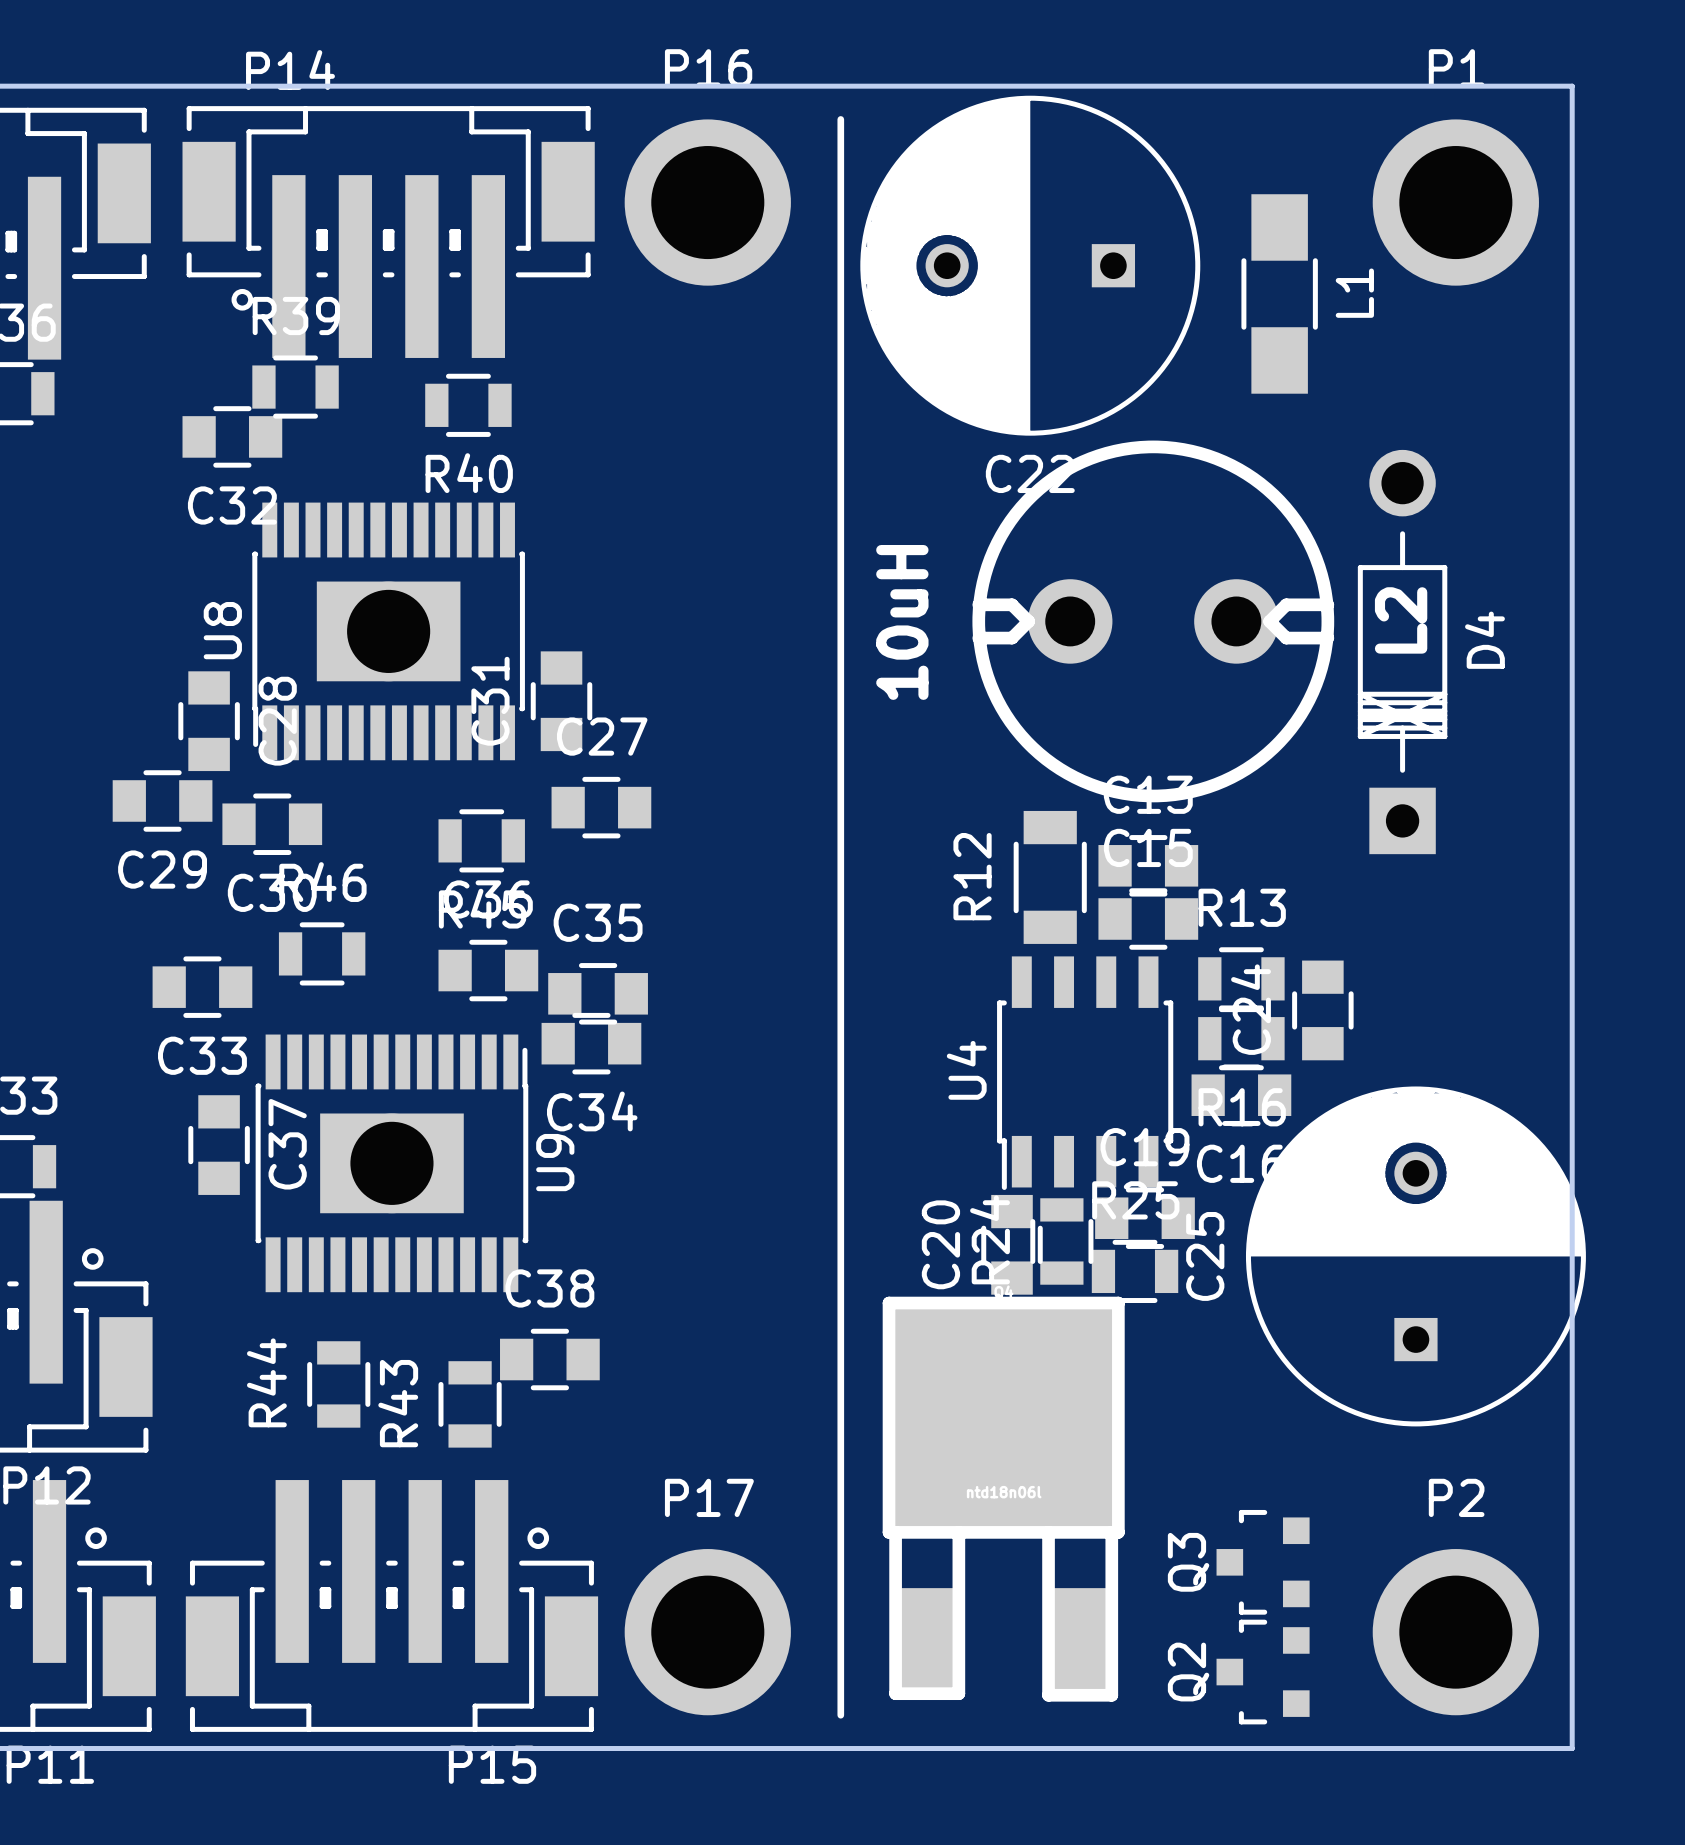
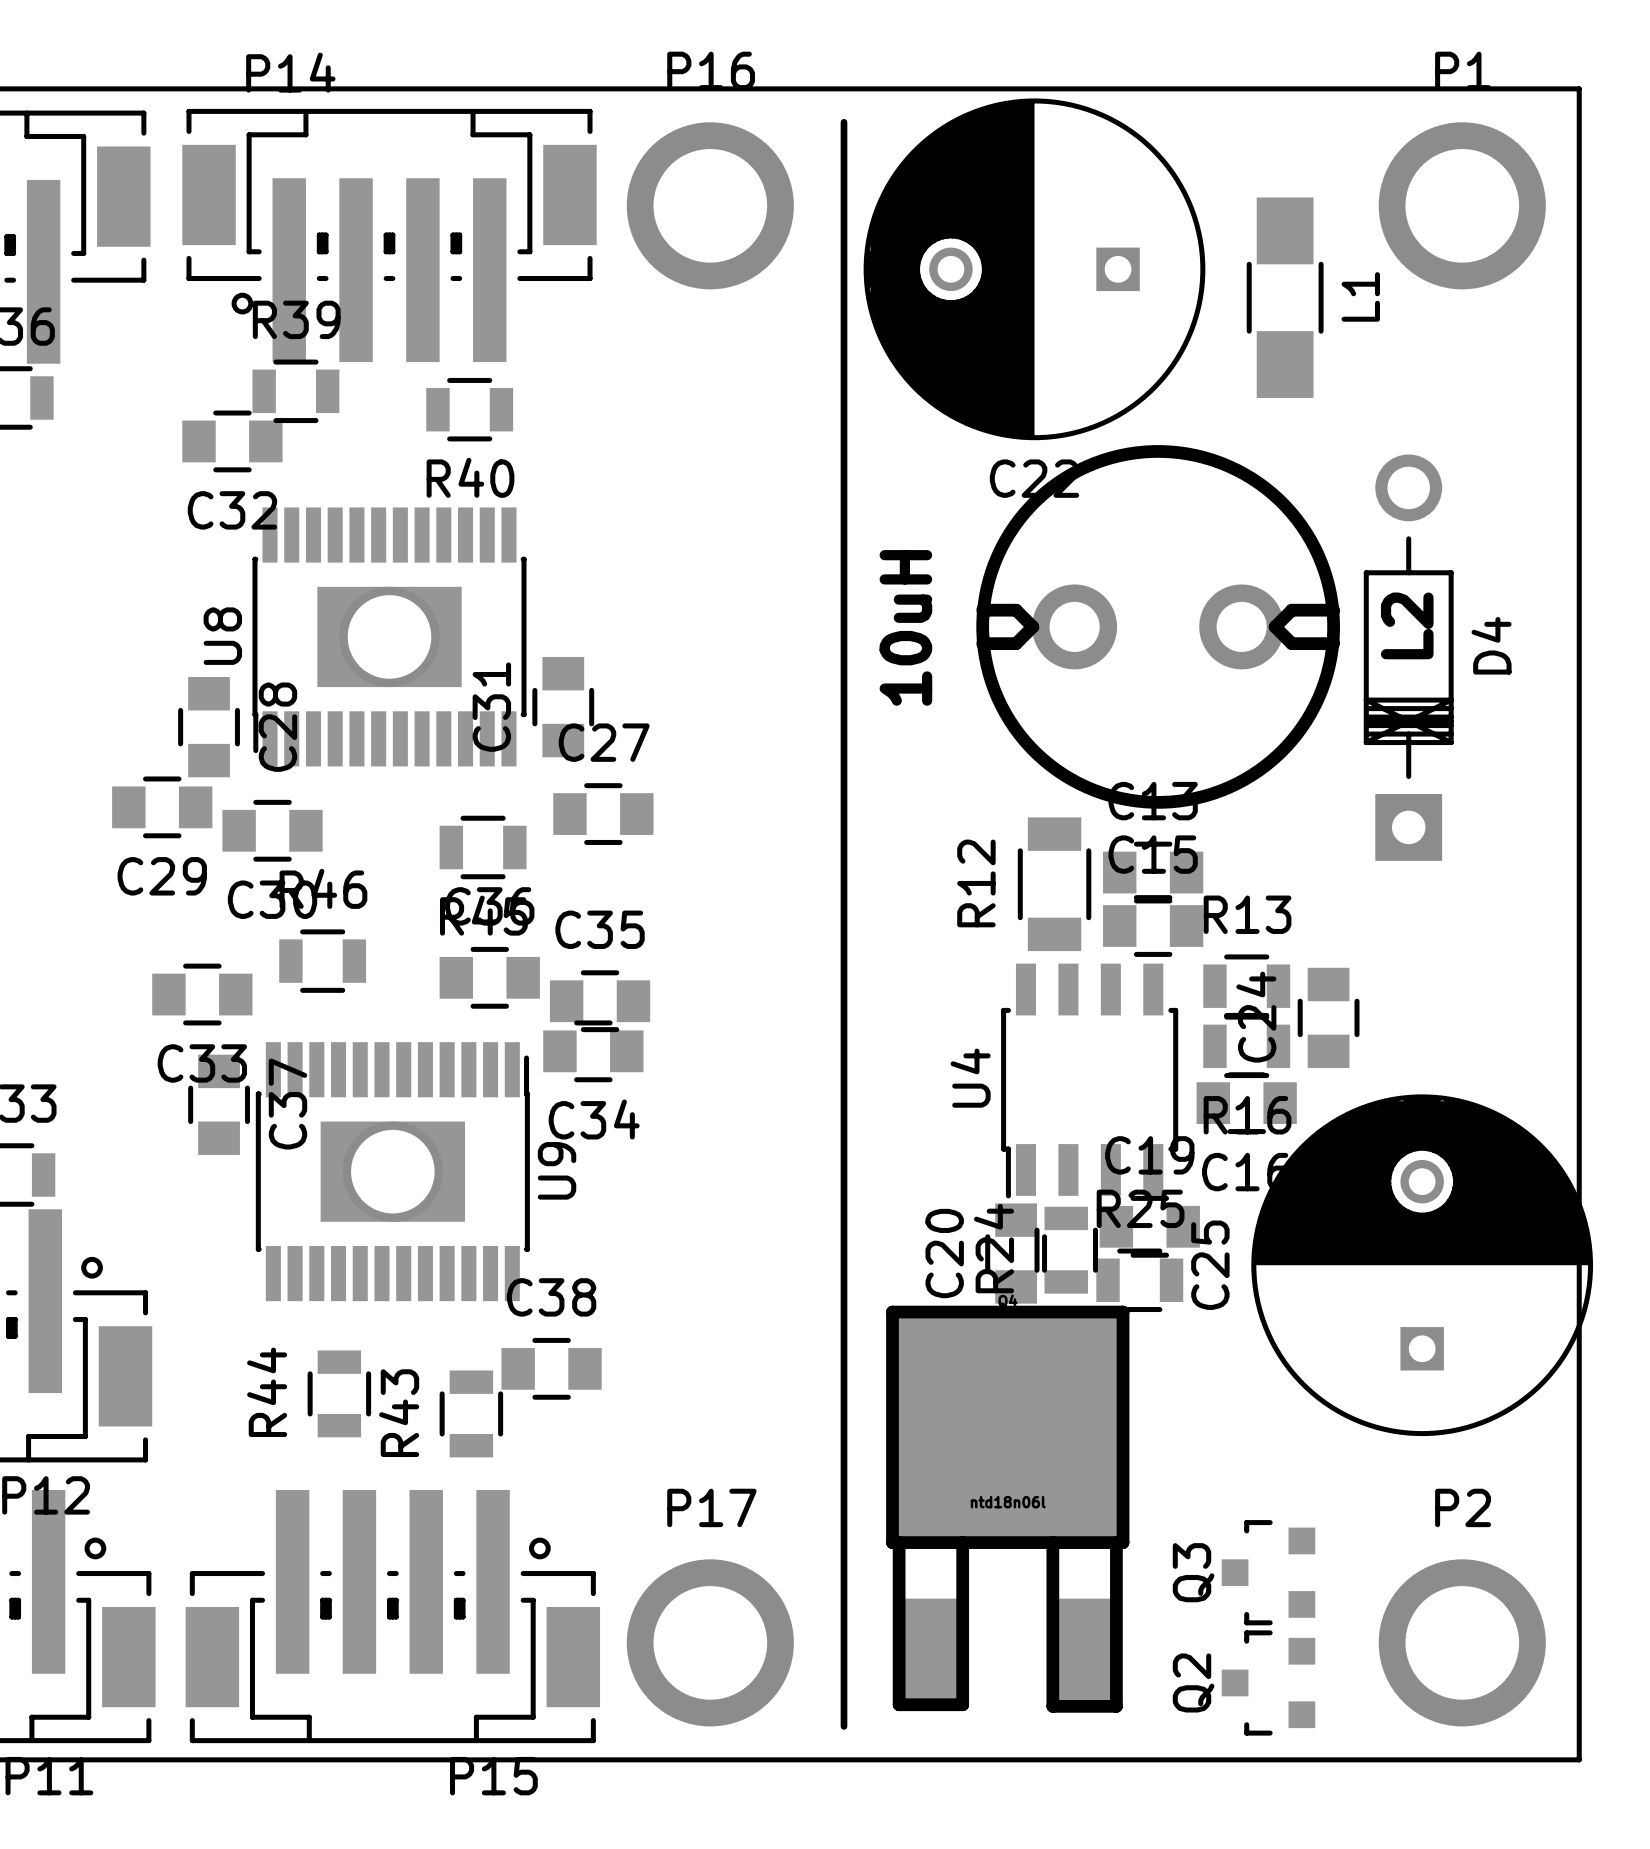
C37 position: (219, 1145) -> (219, 1104)

